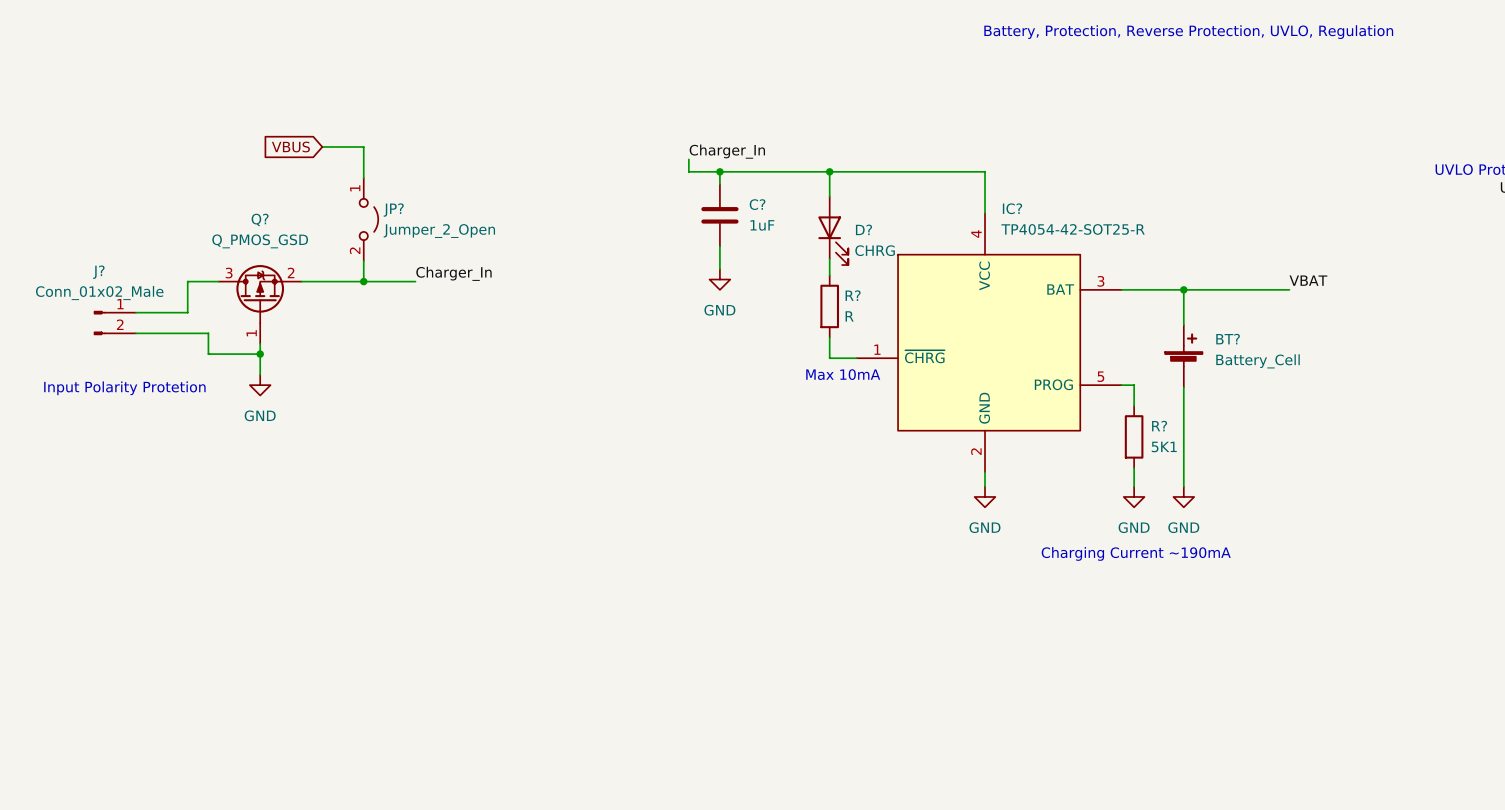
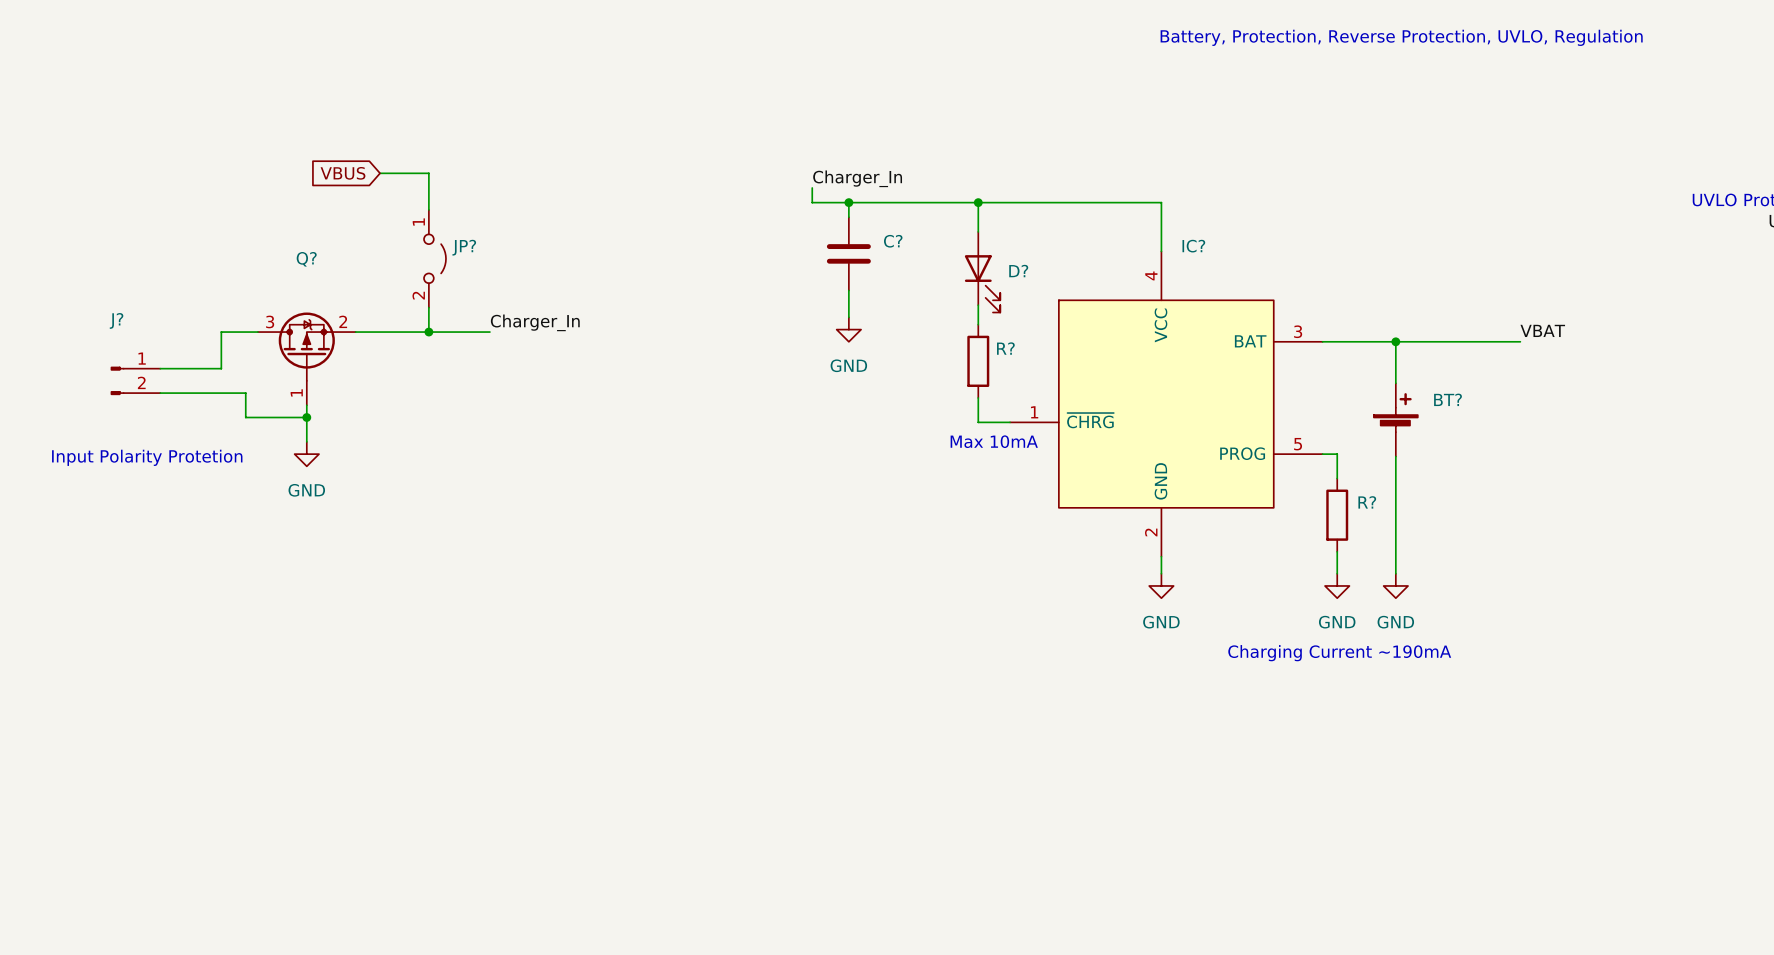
C? value: 1uF (762, 225) -> none
IC? value: TP4054-42-SOT25-R (1073, 229) -> none
JP? value: Jumper_2_Open (439, 231) -> none
Q? value: Q_PMOS_GSD (260, 241) -> none
D? value: CHRG (875, 250) -> none
J? value: Conn_01x02_Male (99, 293) -> none
R? value: R (849, 316) -> none
BT? value: Battery_Cell (1258, 361) -> none
R? value: 5K1 (1164, 446) -> none

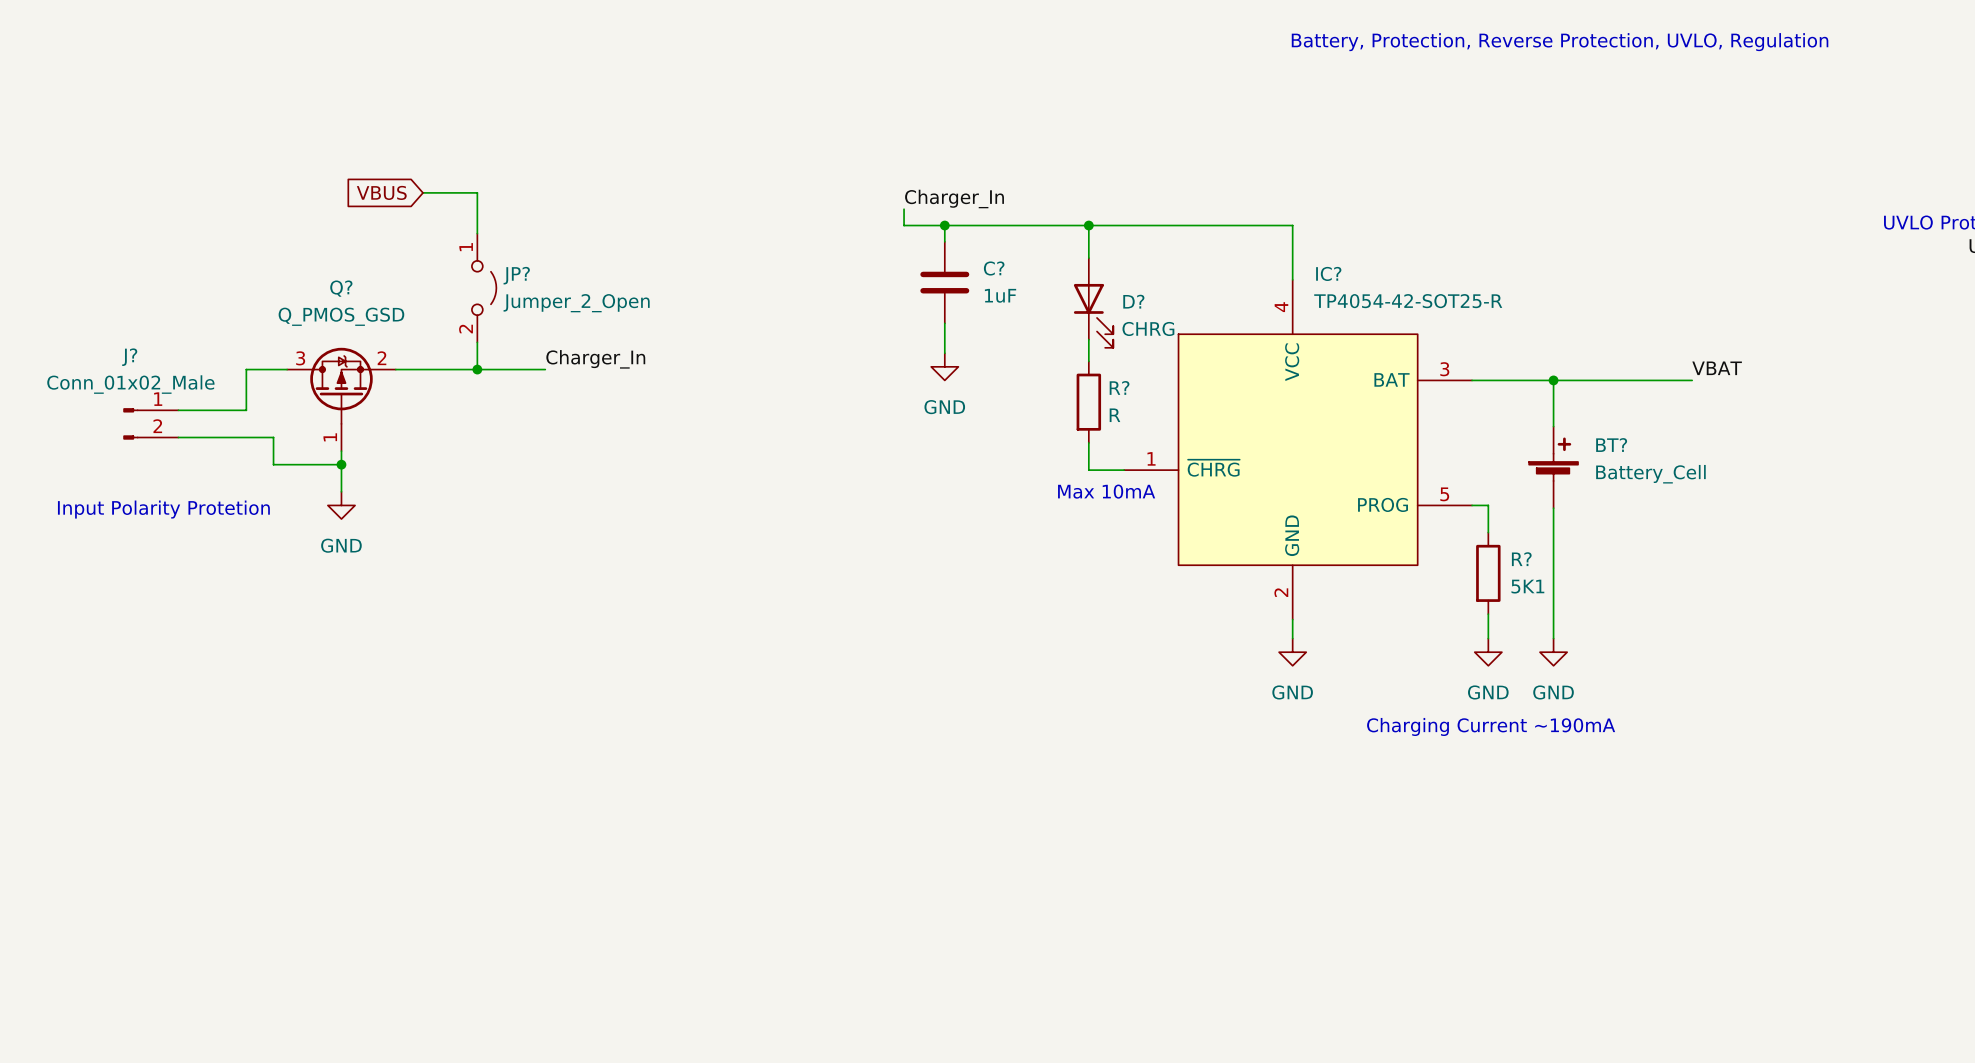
C? value: none -> 1uF (1000, 295)
IC? value: none -> TP4054-42-SOT25-R (1408, 301)
JP? value: none -> Jumper_2_Open (576, 303)
Q? value: none -> Q_PMOS_GSD (341, 316)
D? value: none -> CHRG (1148, 328)
J? value: none -> Conn_01x02_Male (130, 384)
R? value: none -> R (1114, 415)
BT? value: none -> Battery_Cell (1650, 474)
R? value: none -> 5K1 (1527, 586)

